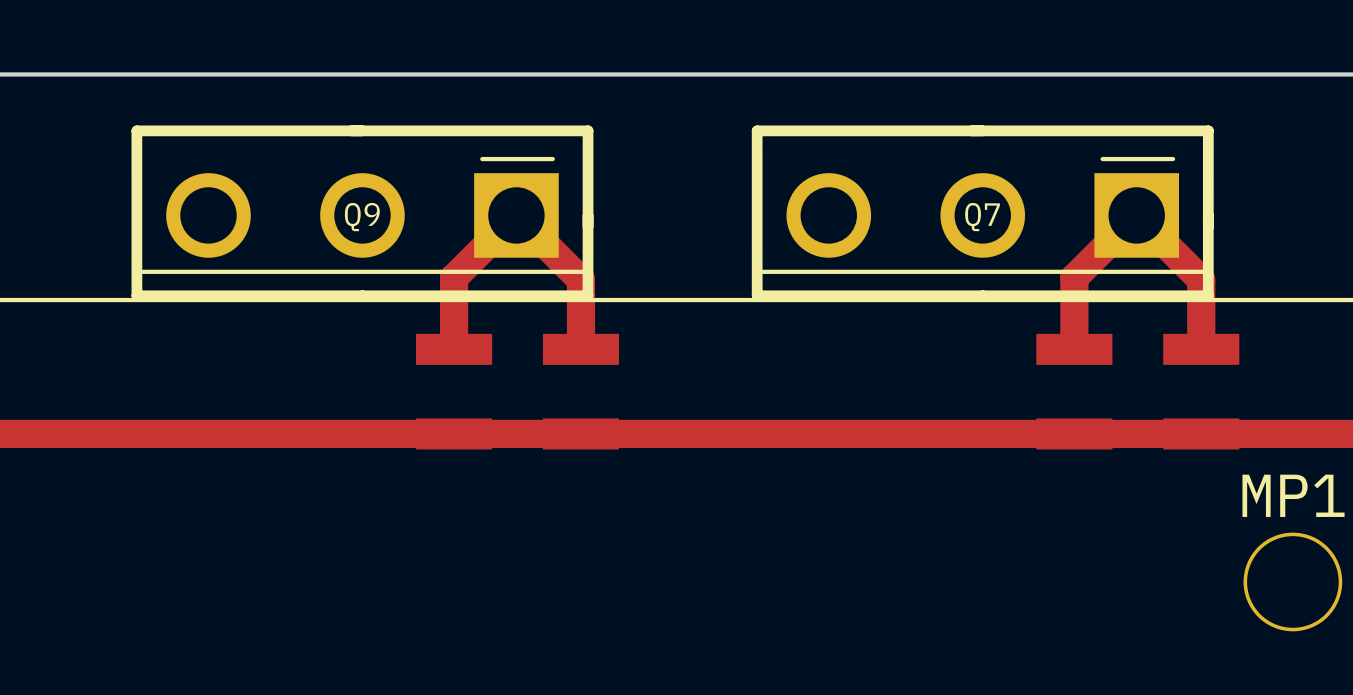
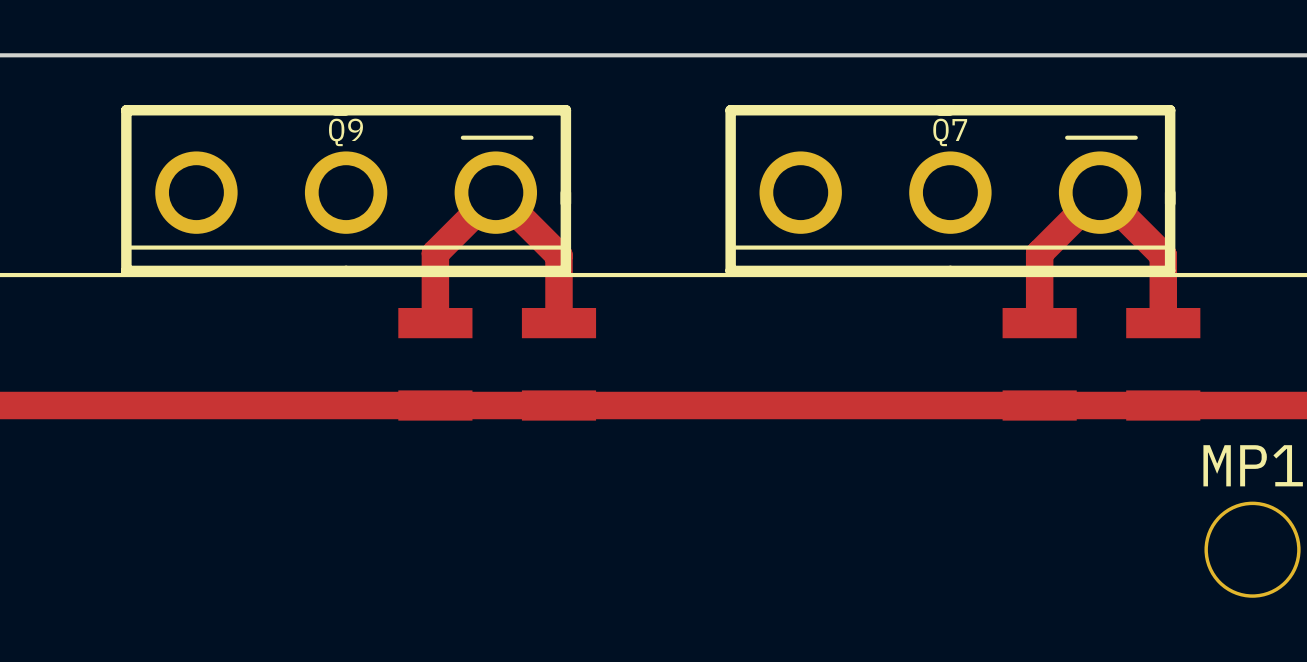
Q9 footprint: [131, 125, 594, 302] -> [121, 105, 572, 277]
Q7 footprint: [751, 125, 1214, 302] -> [725, 105, 1176, 277]
Q9 name position: Q9 (362, 217) -> Q9 (345, 132)
Q7 name position: Q7 (982, 217) -> Q7 (950, 132)

